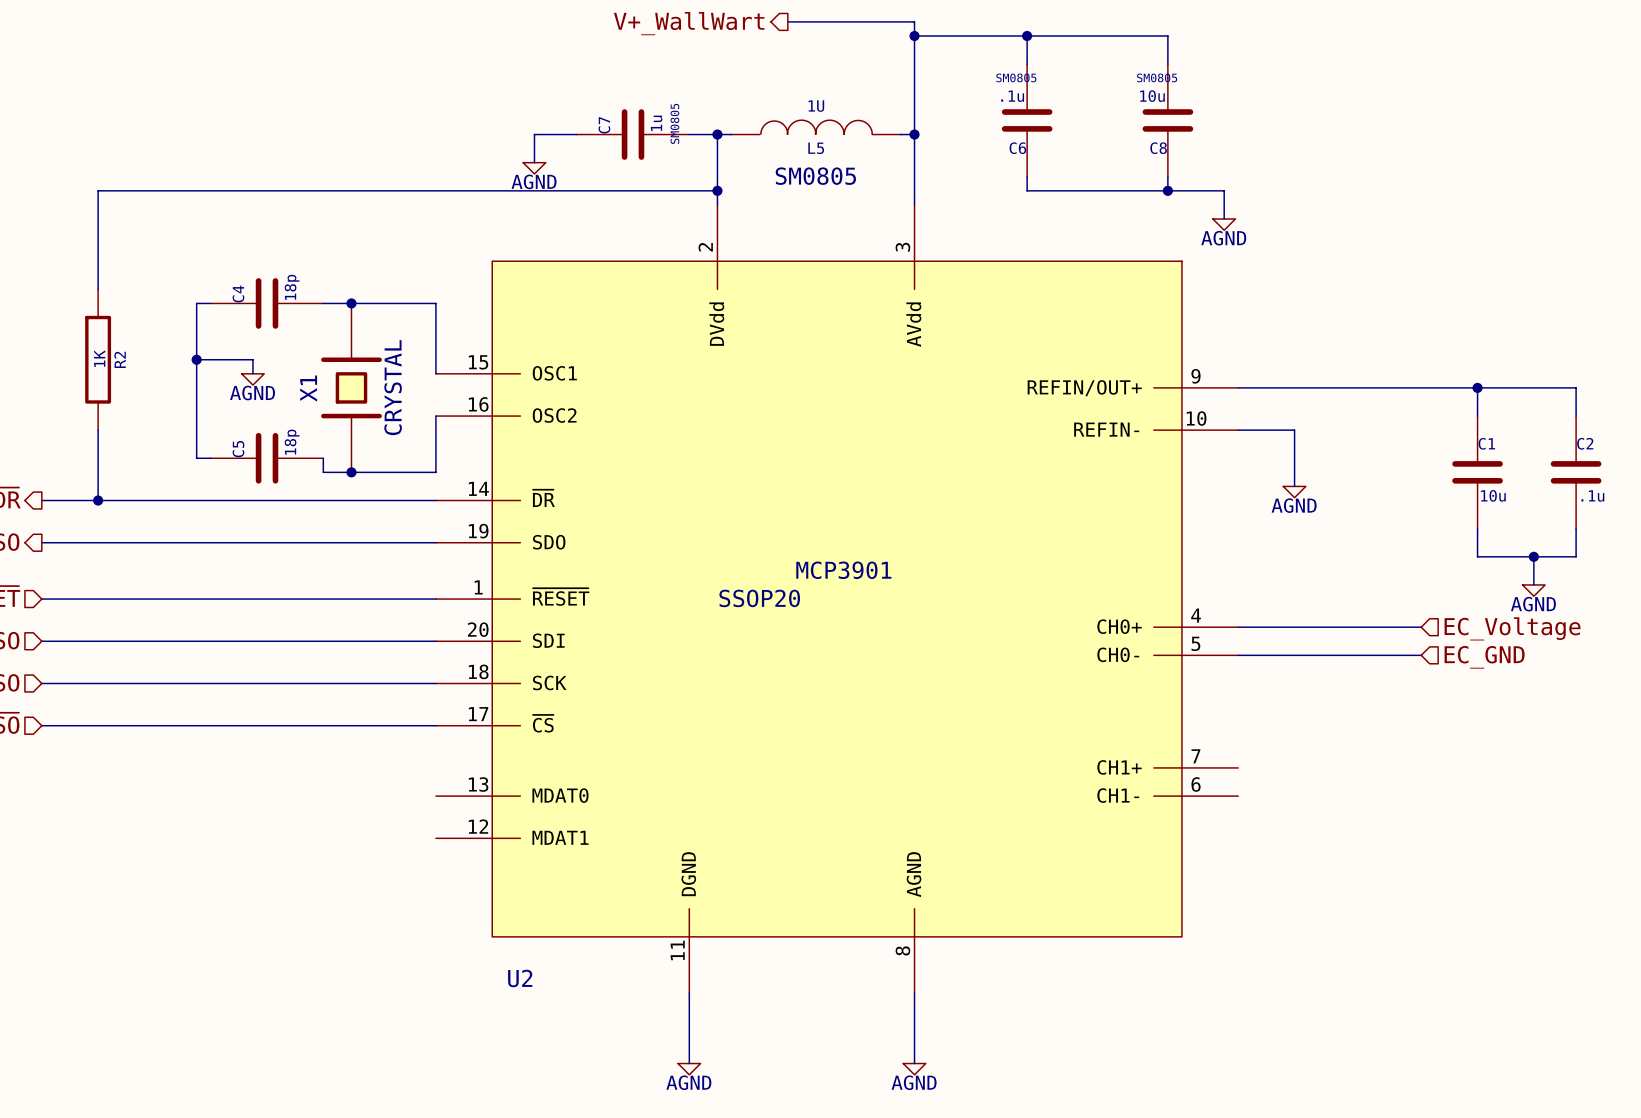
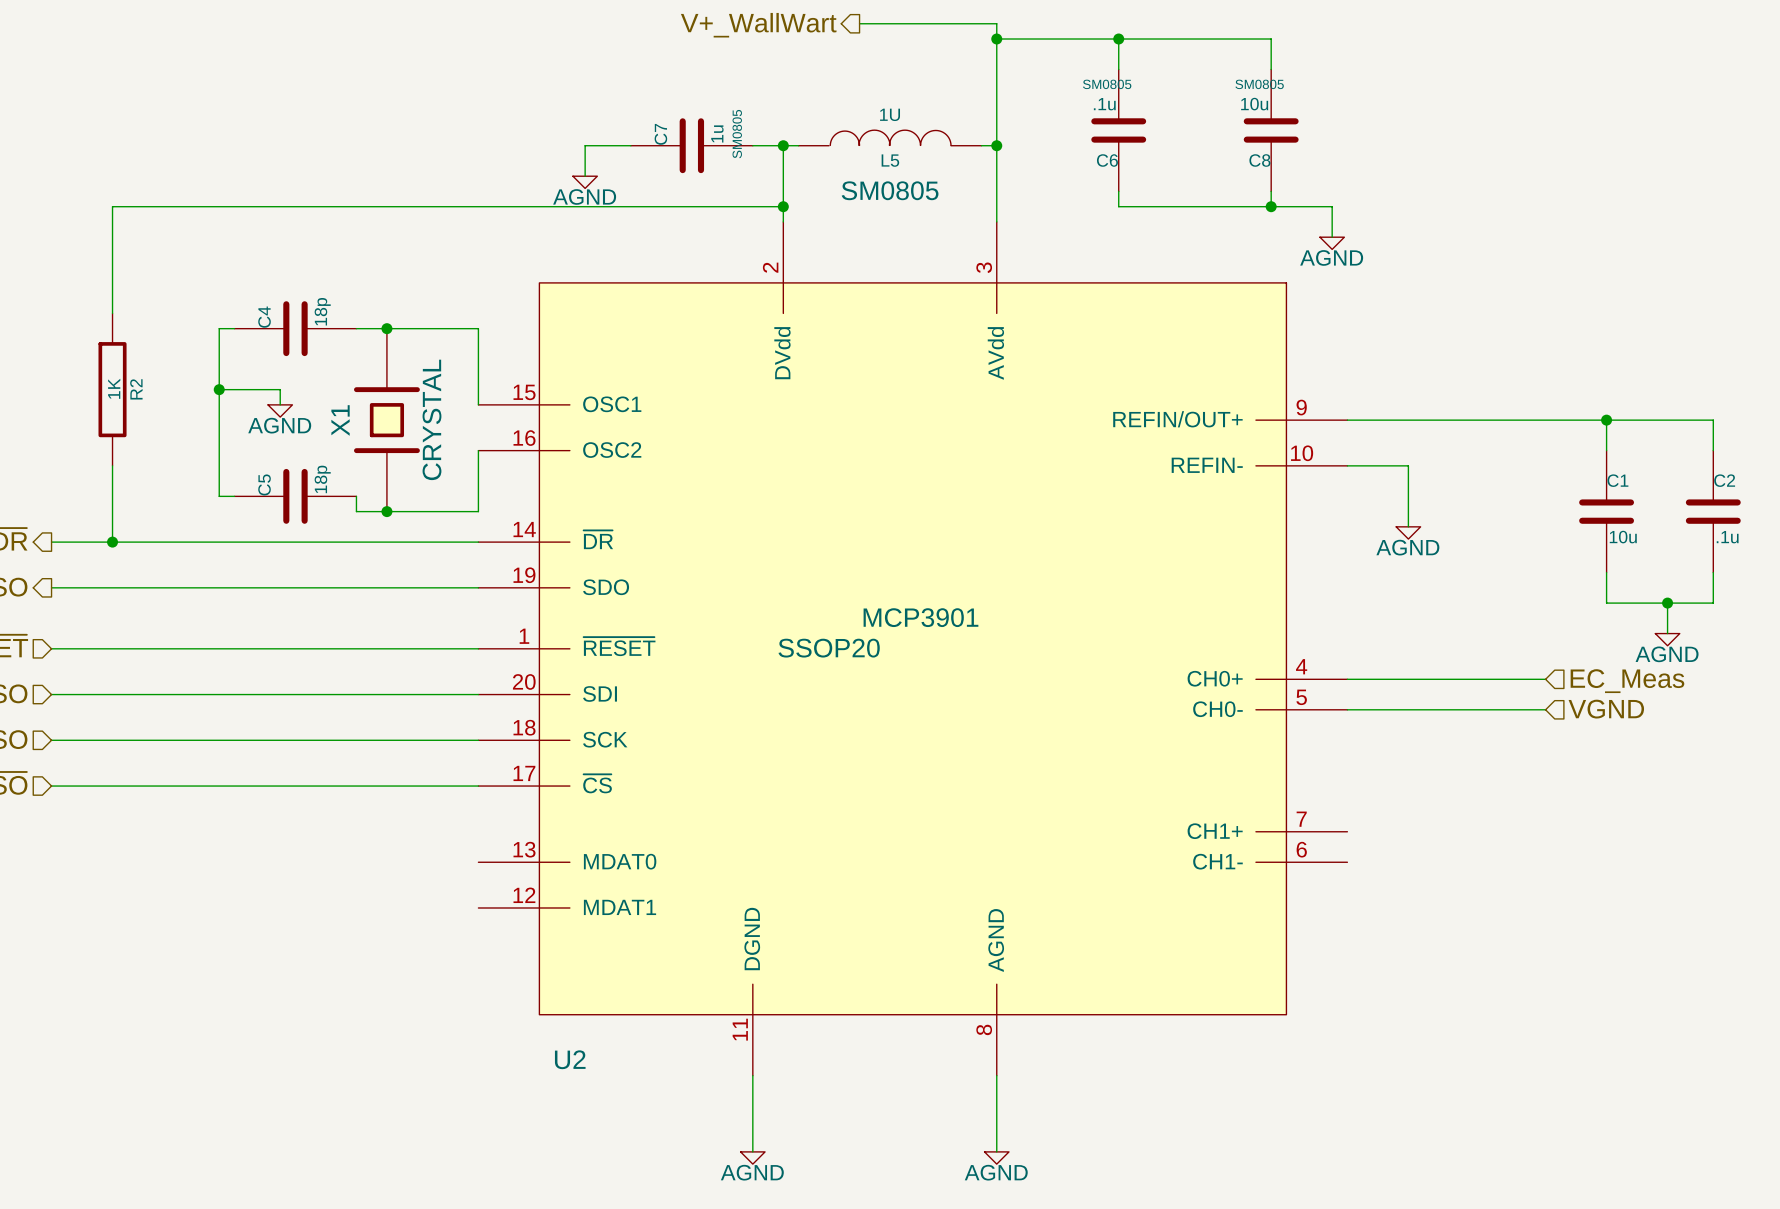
hierarchical label: EC_Voltage (1512, 628) -> EC_Meas (1627, 681)
hierarchical label: EC_GND (1484, 657) -> VGND (1606, 709)

